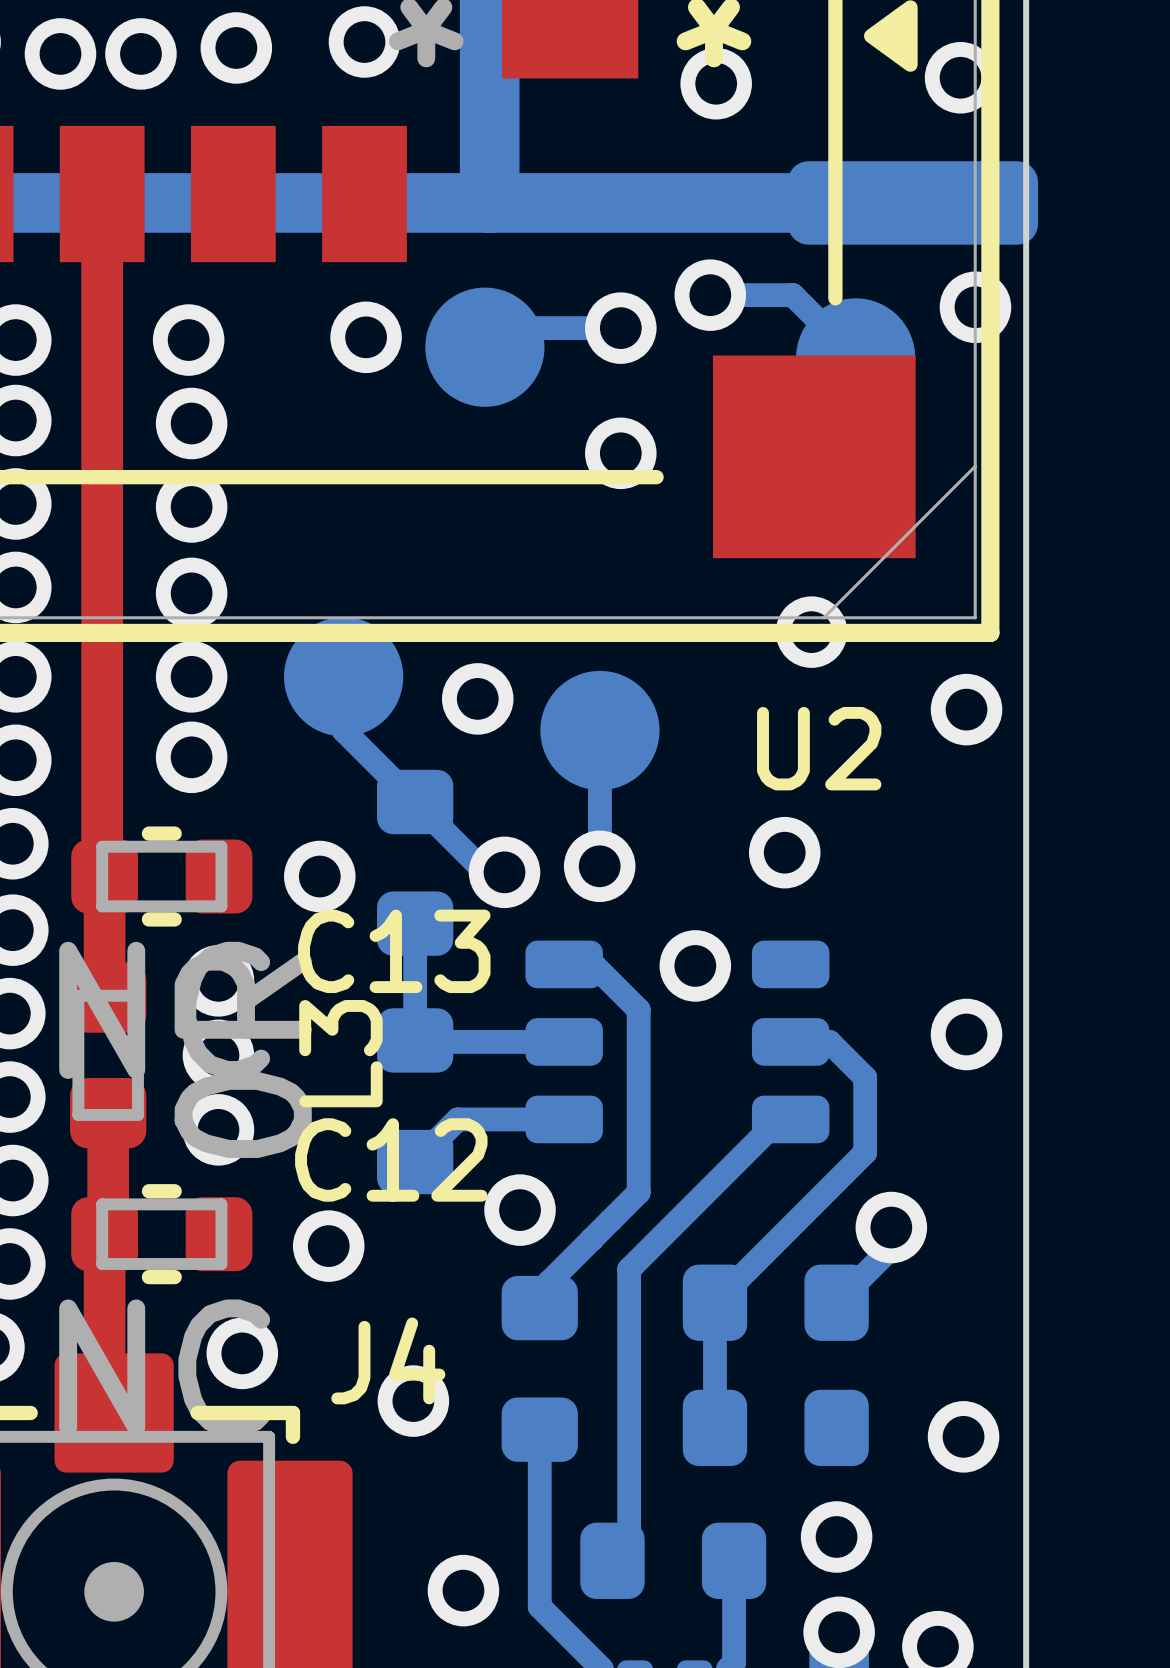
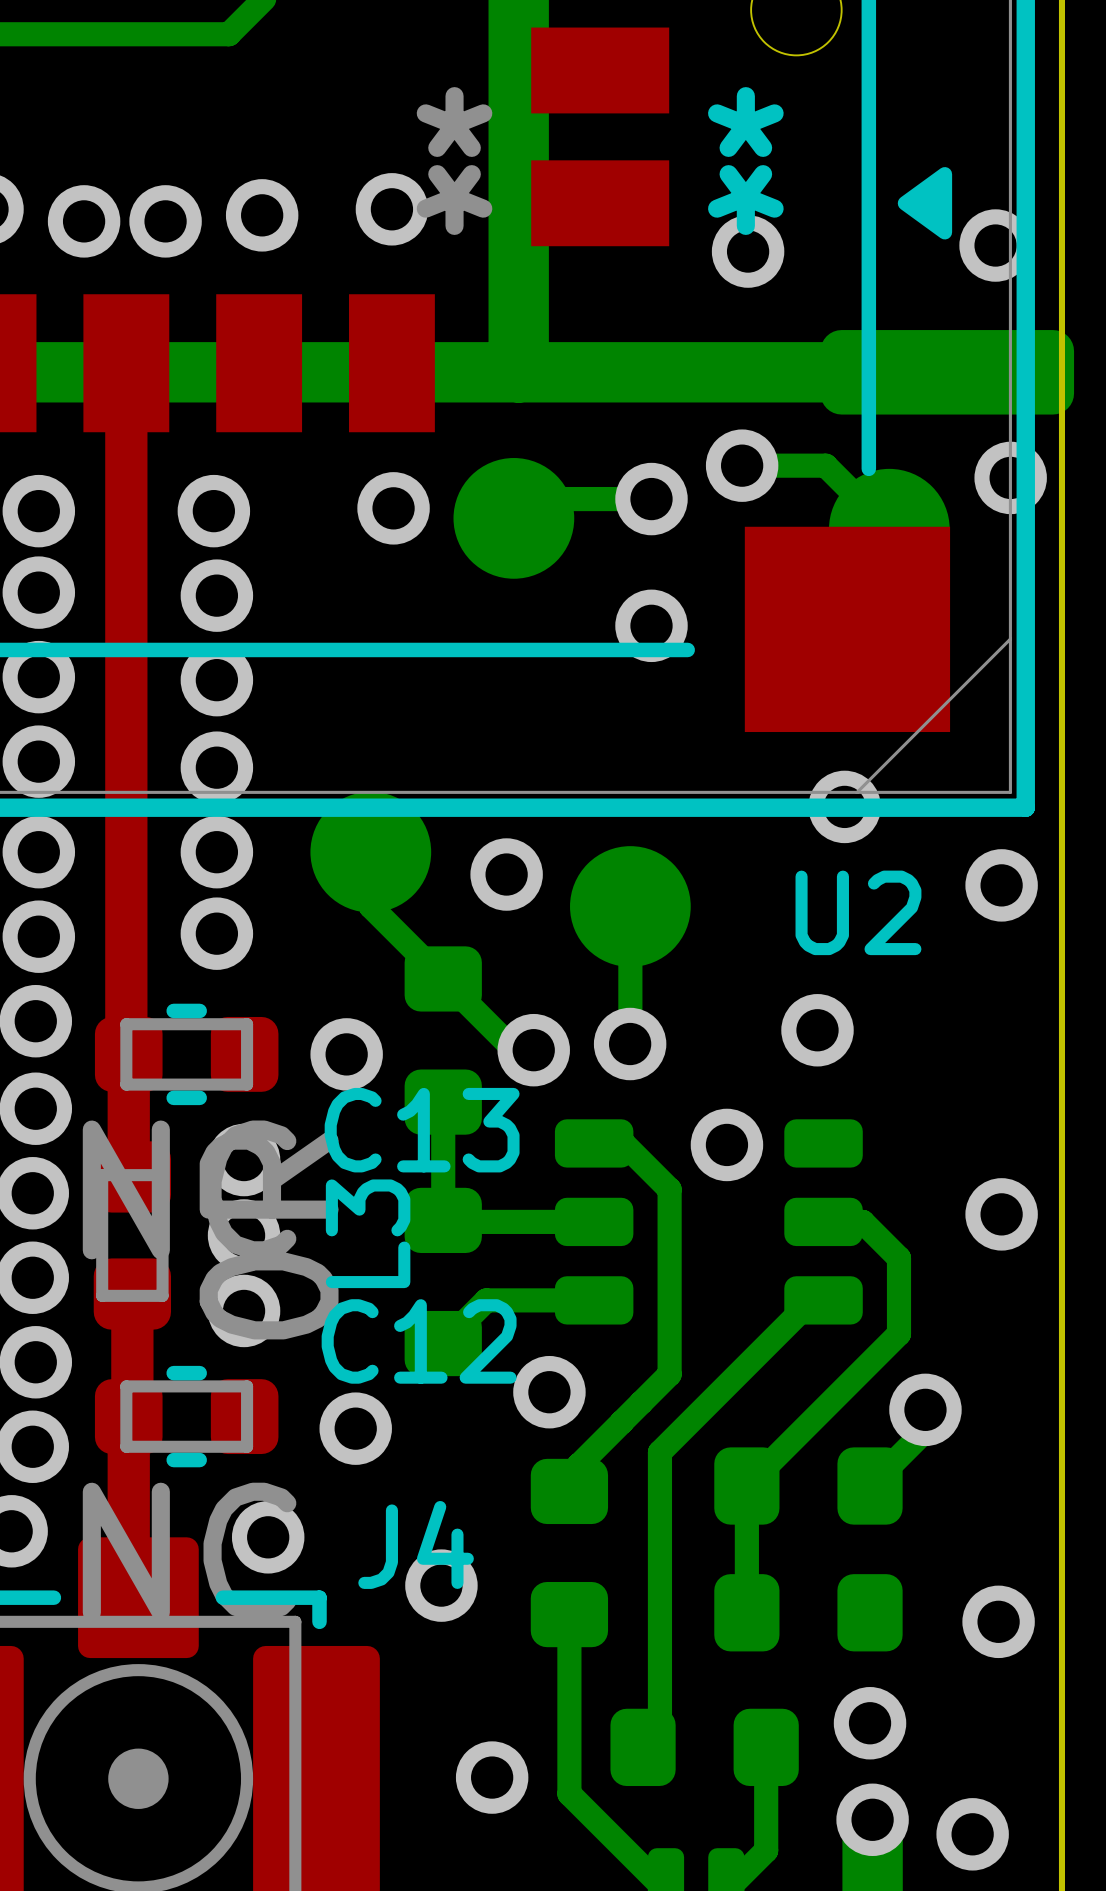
U2 name position: U2 (819, 748) -> U2 (858, 912)

